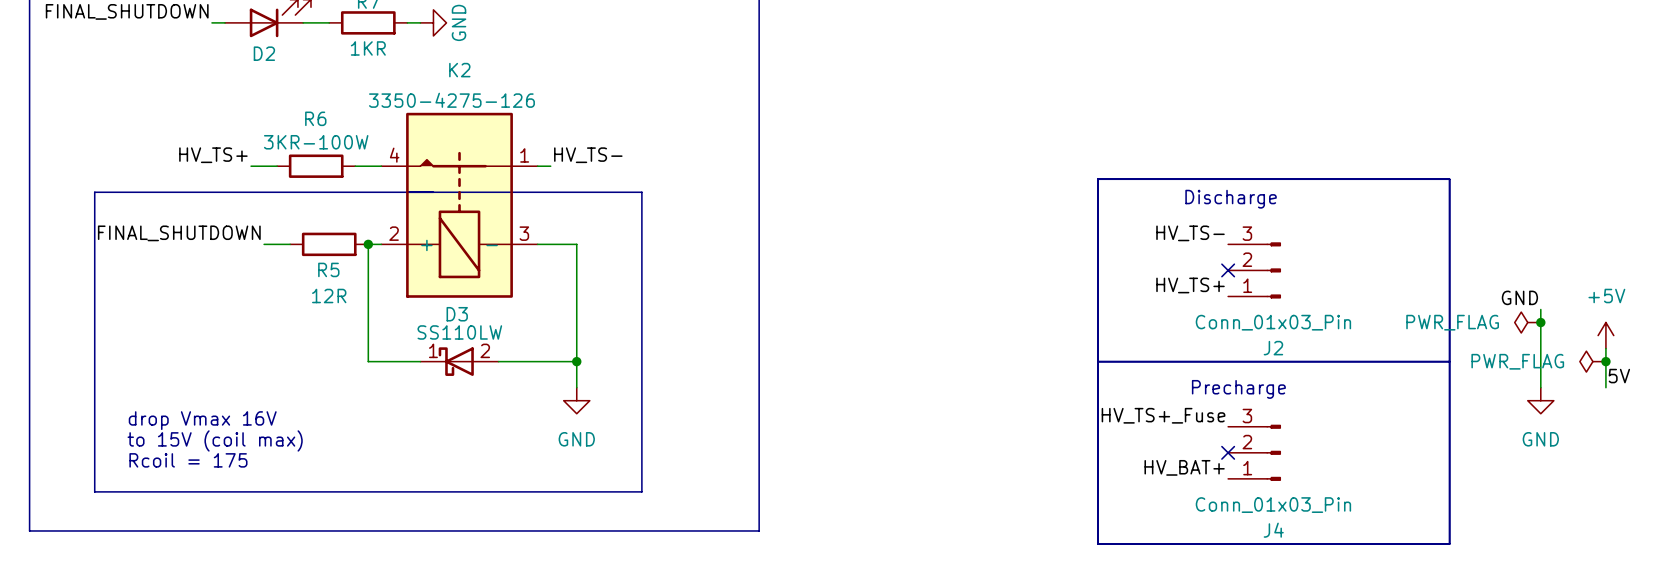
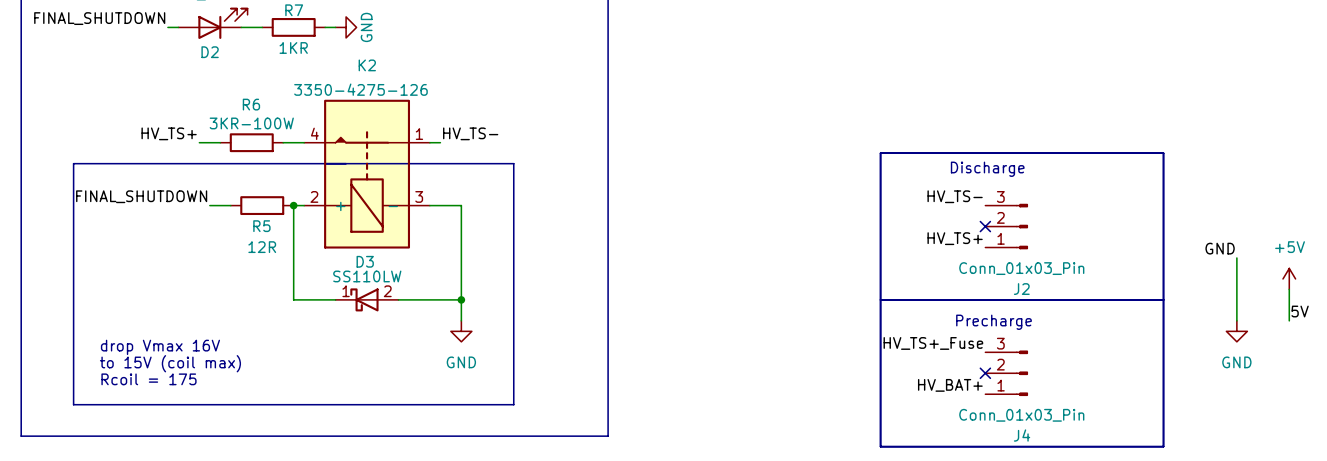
power symbol: PWR_FLAG (1527, 322) -> none
junction: (1540, 322) -> none
power symbol: PWR_FLAG (1592, 361) -> none
junction: (1605, 361) -> none

